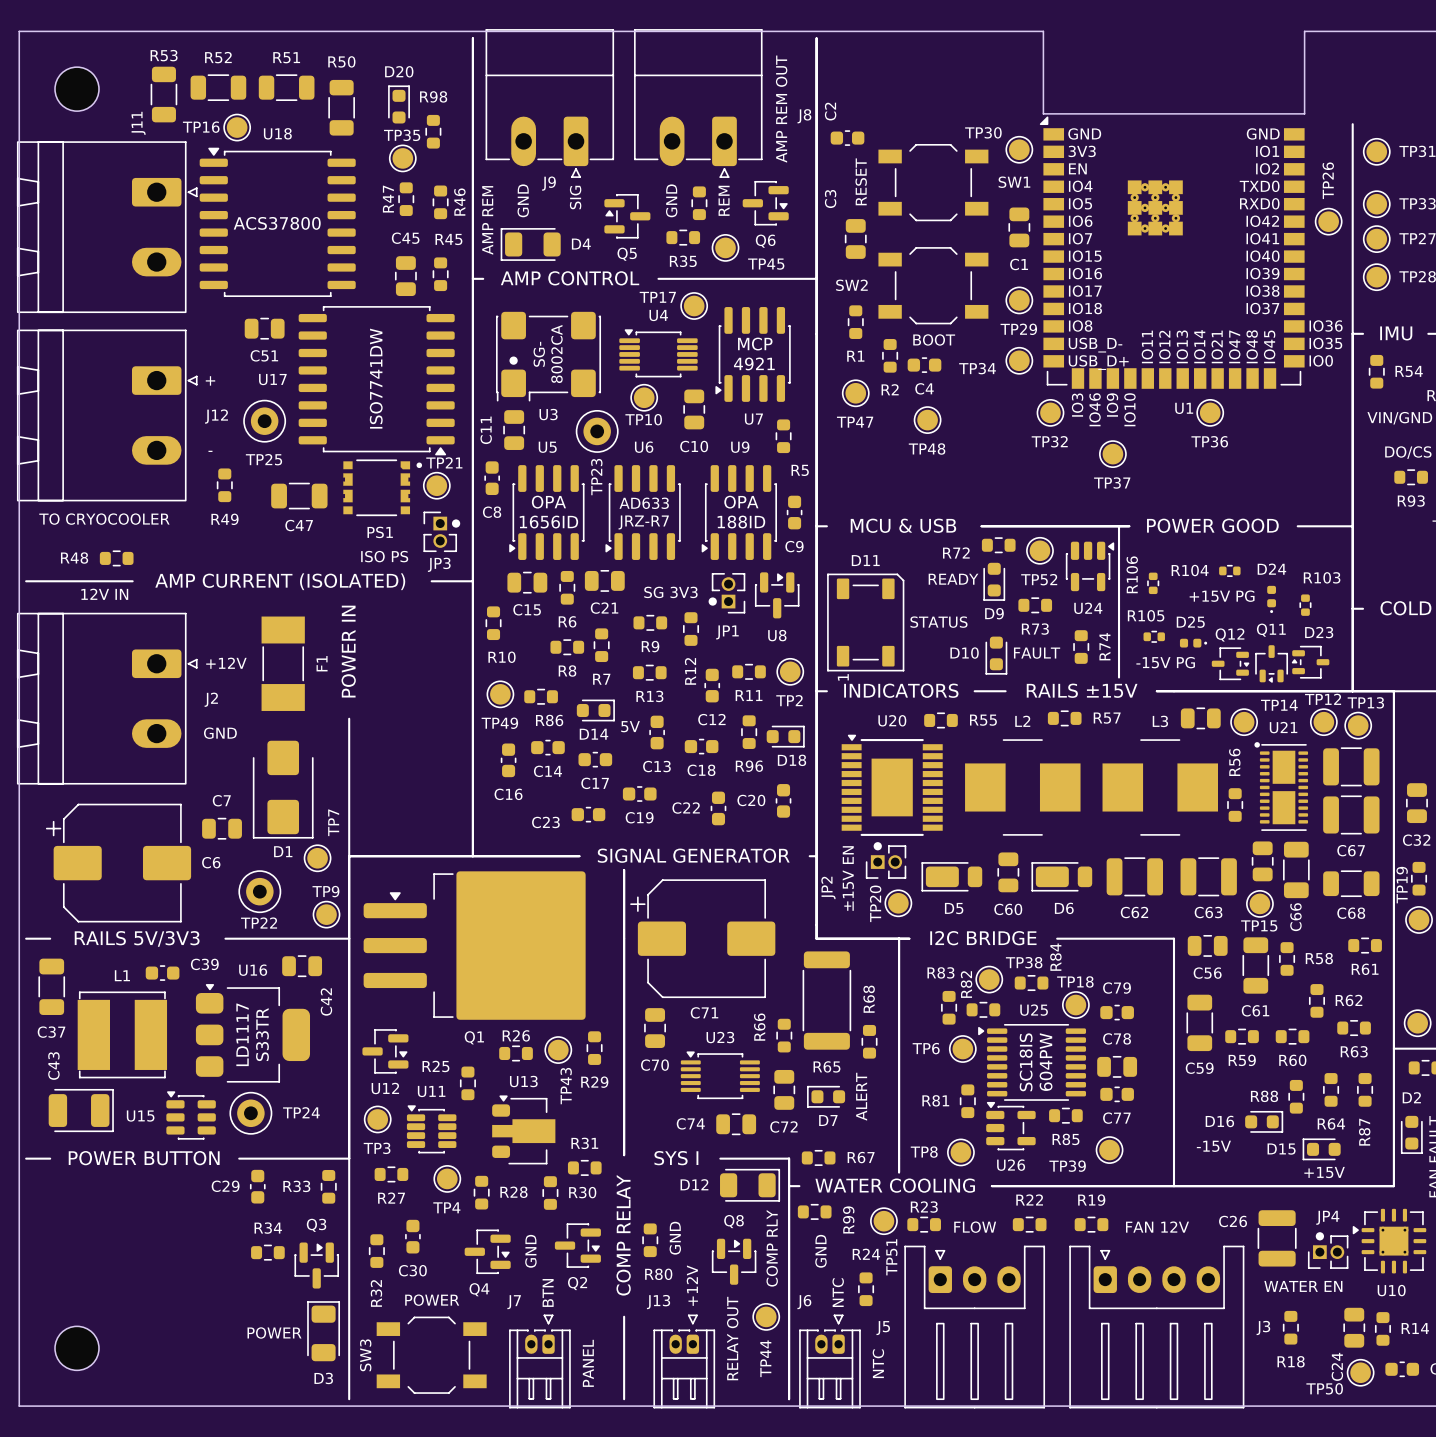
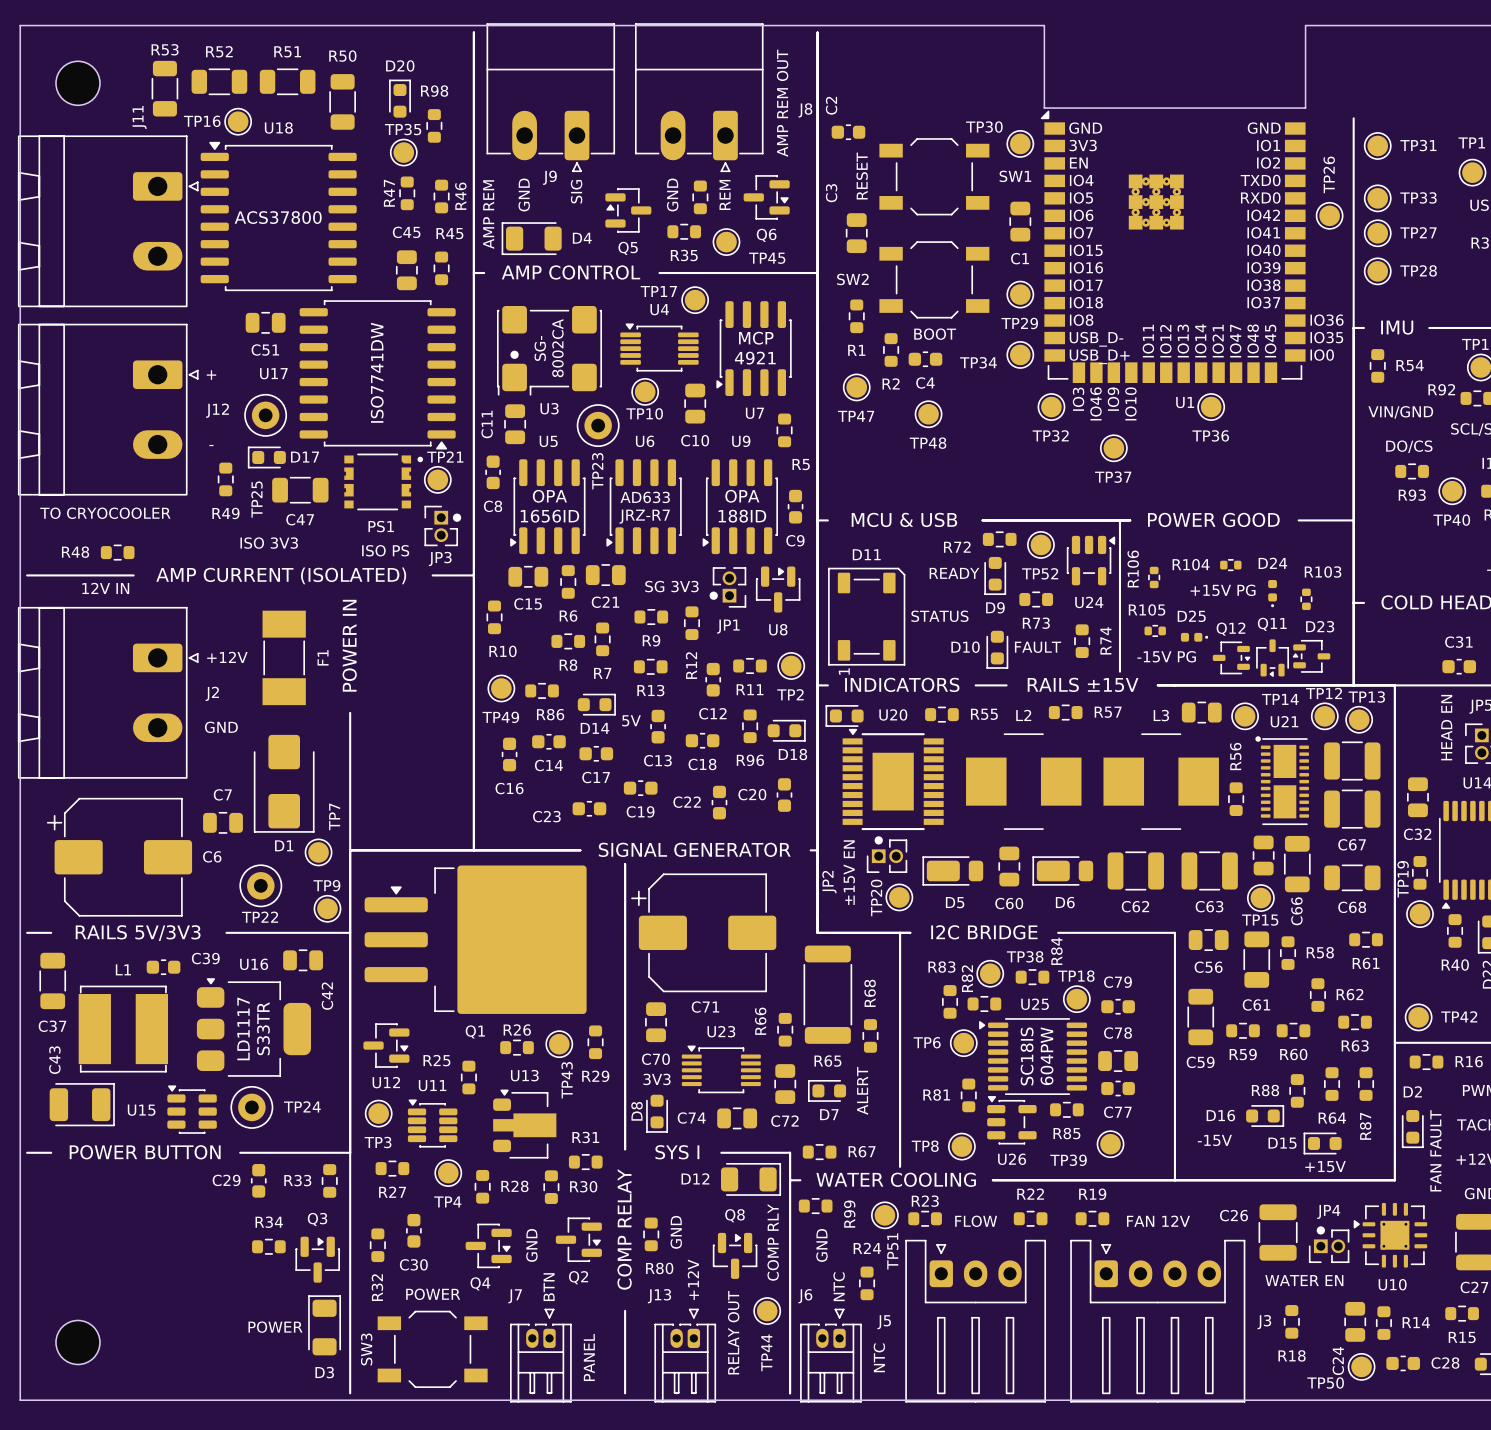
TP25 name rotation: 0° (263, 459) -> 90° counterclockwise (256, 499)
D17: none -> (266, 457)
text: none -> ISO 3V3 (269, 543)
part: none -> (844, 715)
text: none -> 3V3 (657, 1079)
D8: none -> (657, 1113)

